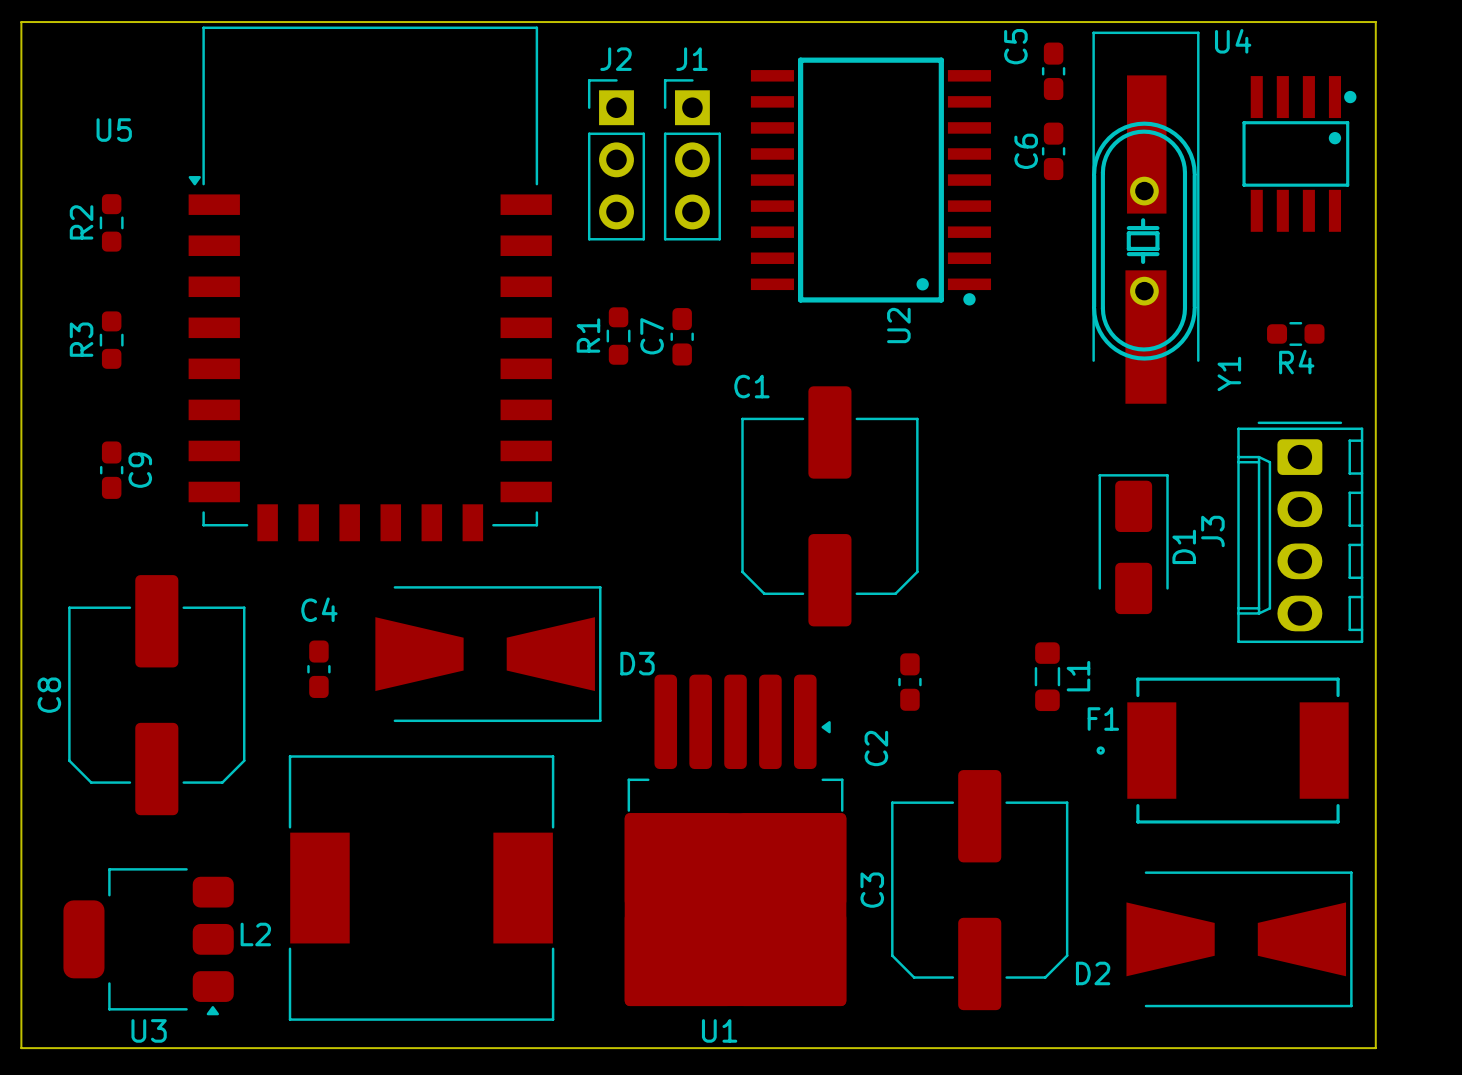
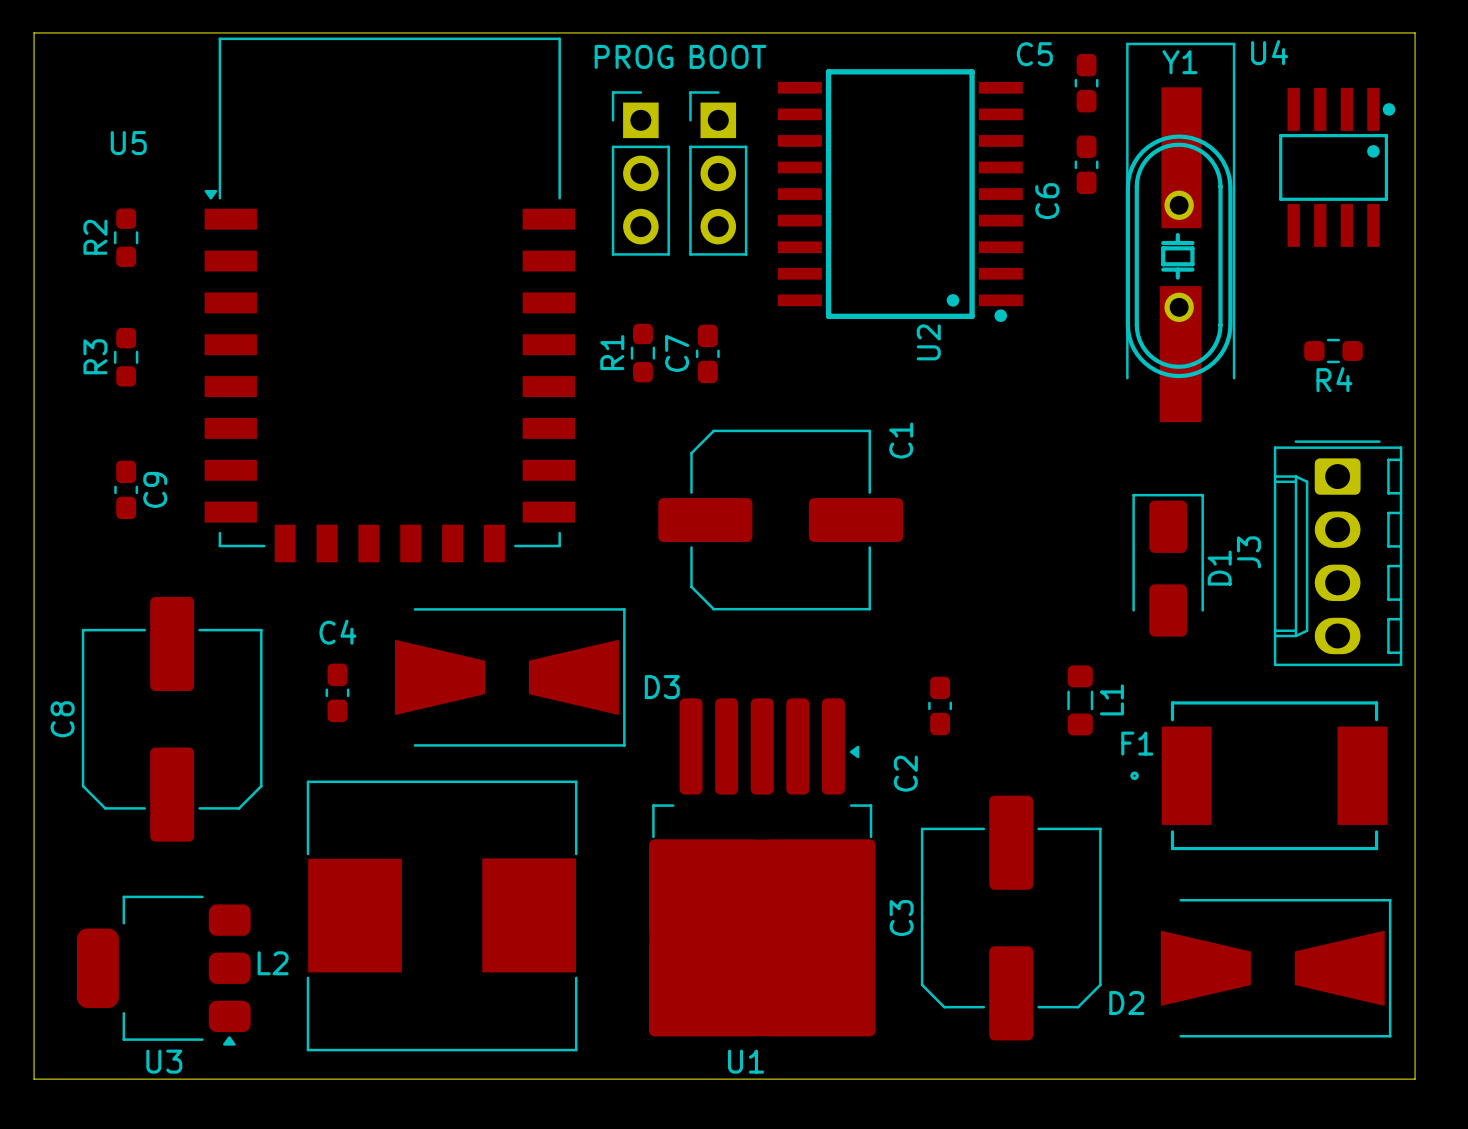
J2 value: none -> PROG (634, 56)
J1 value: none -> BOOT (728, 56)
C5 name rotation: 0° (1015, 46) -> 90° clockwise (1034, 54)
J2 name: J2 (616, 59) -> none
J1 name: J1 (691, 59) -> none
C6 name position: C6 (1026, 151) -> C6 (1047, 201)
Y1 name rotation: 0° (1229, 373) -> 90° clockwise (1179, 62)
Y1 name position: Y1 (1229, 373) -> Y1 (1179, 62)
C1 rotation: 0° (829, 506) -> 90° clockwise (780, 520)
L2 footprint: [288, 755, 555, 1021] -> [306, 780, 578, 1052]

